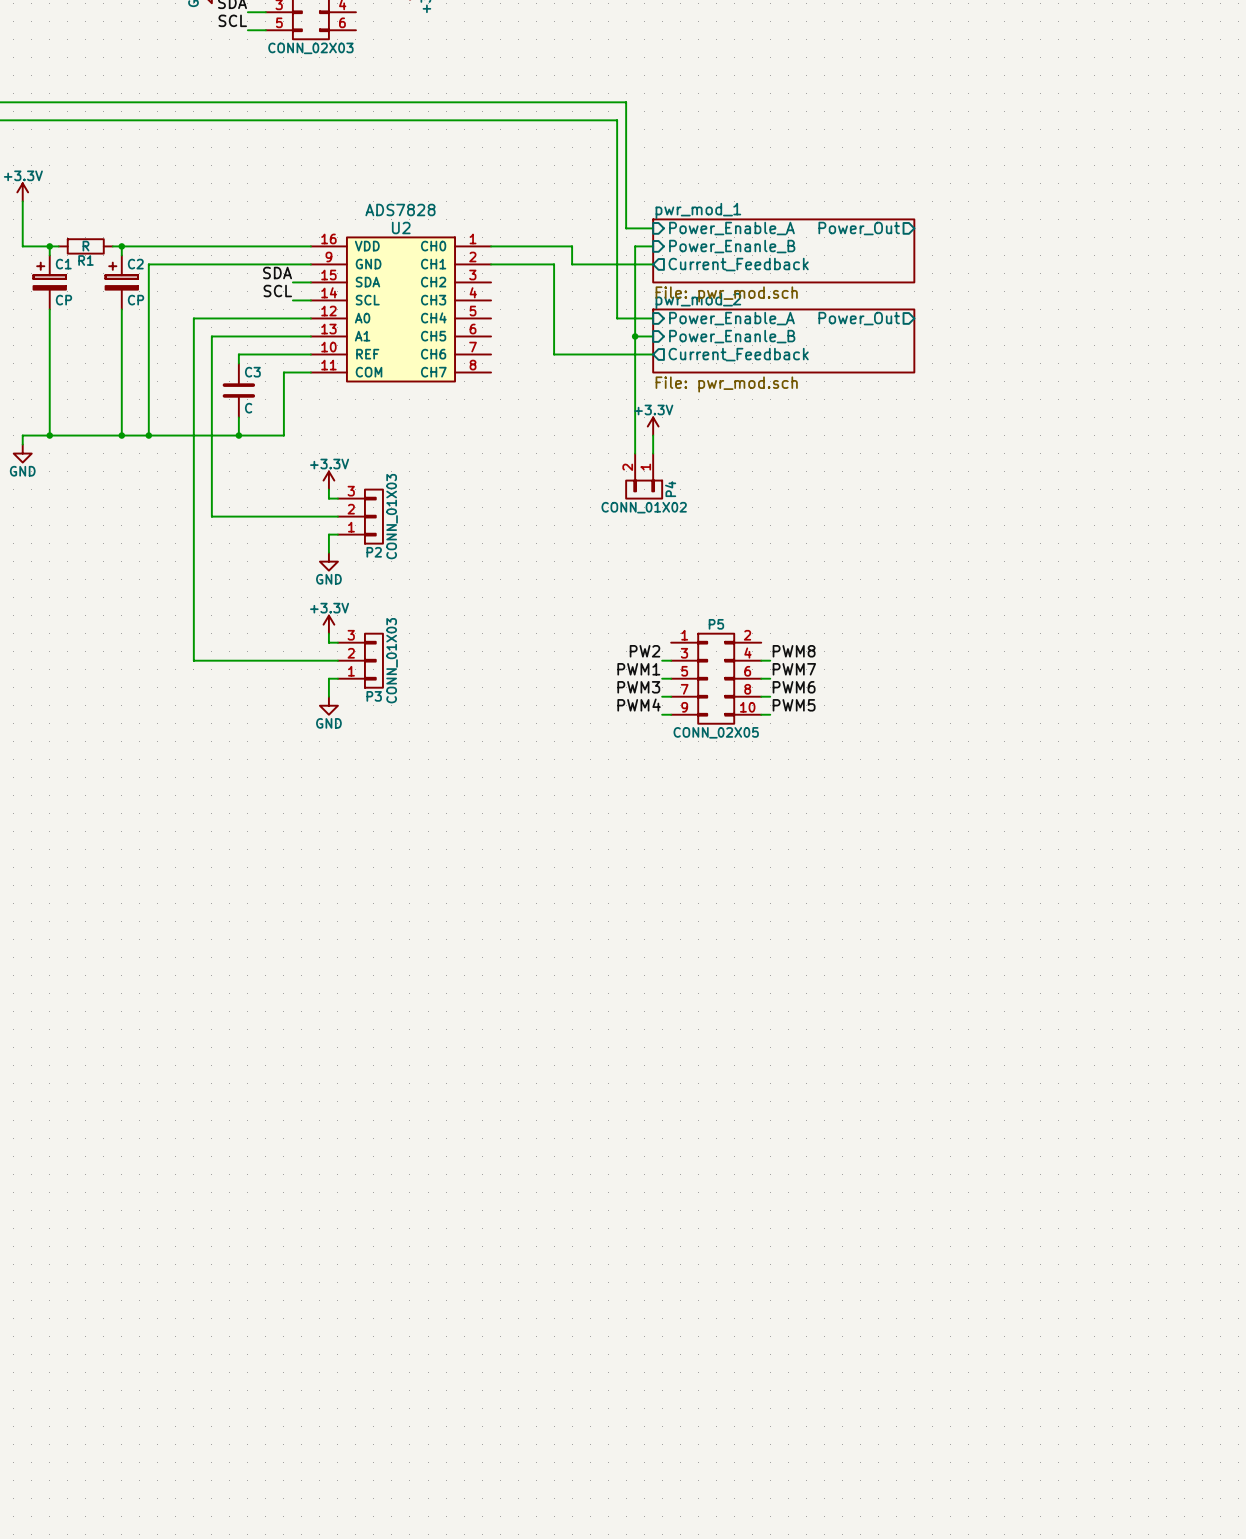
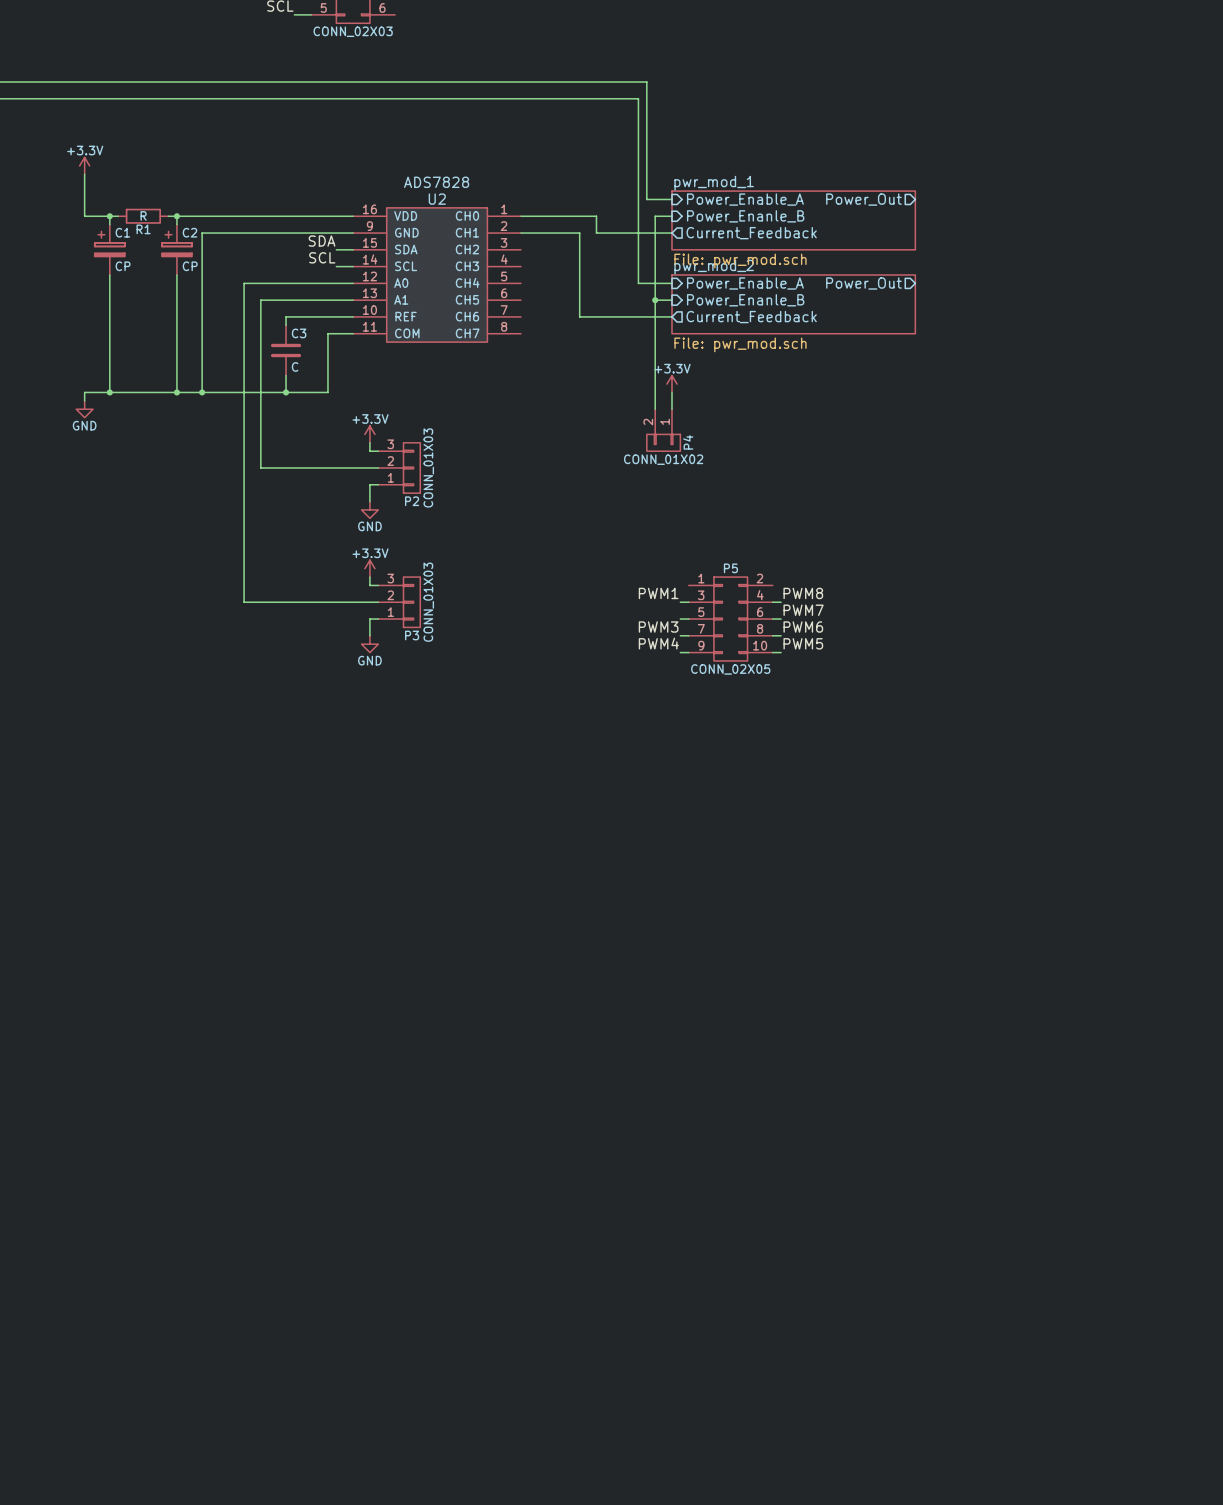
label: PW2 (644, 651) -> PWM1 (658, 593)
label: PWM1 (638, 669) -> none

